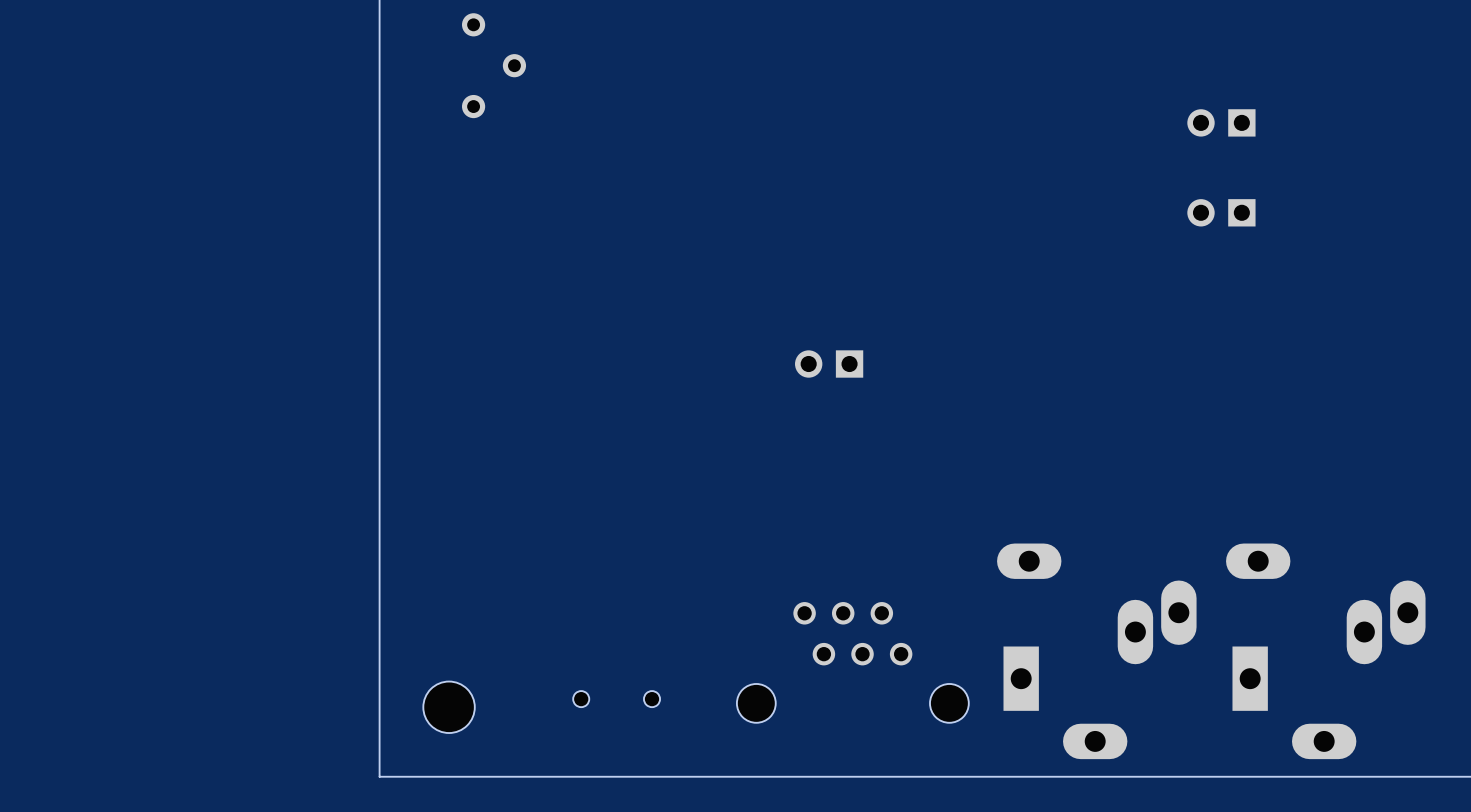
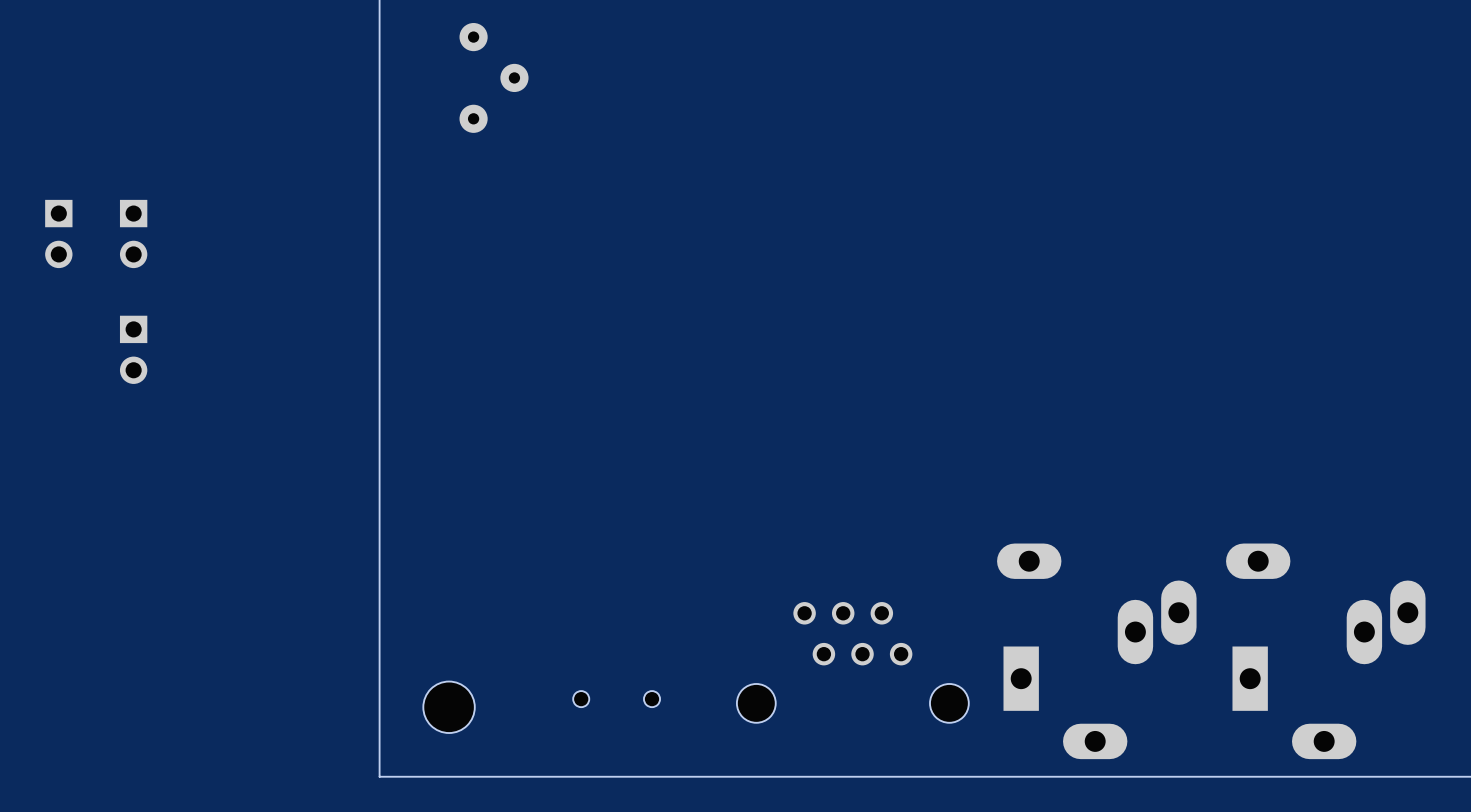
part footprint: [462, 13, 527, 119] -> [459, 23, 529, 133]
part: (1221, 122) -> none
part: (1221, 212) -> none
part: none -> (58, 233)
part: none -> (133, 233)
part: none -> (133, 349)
part: (829, 364) -> none

